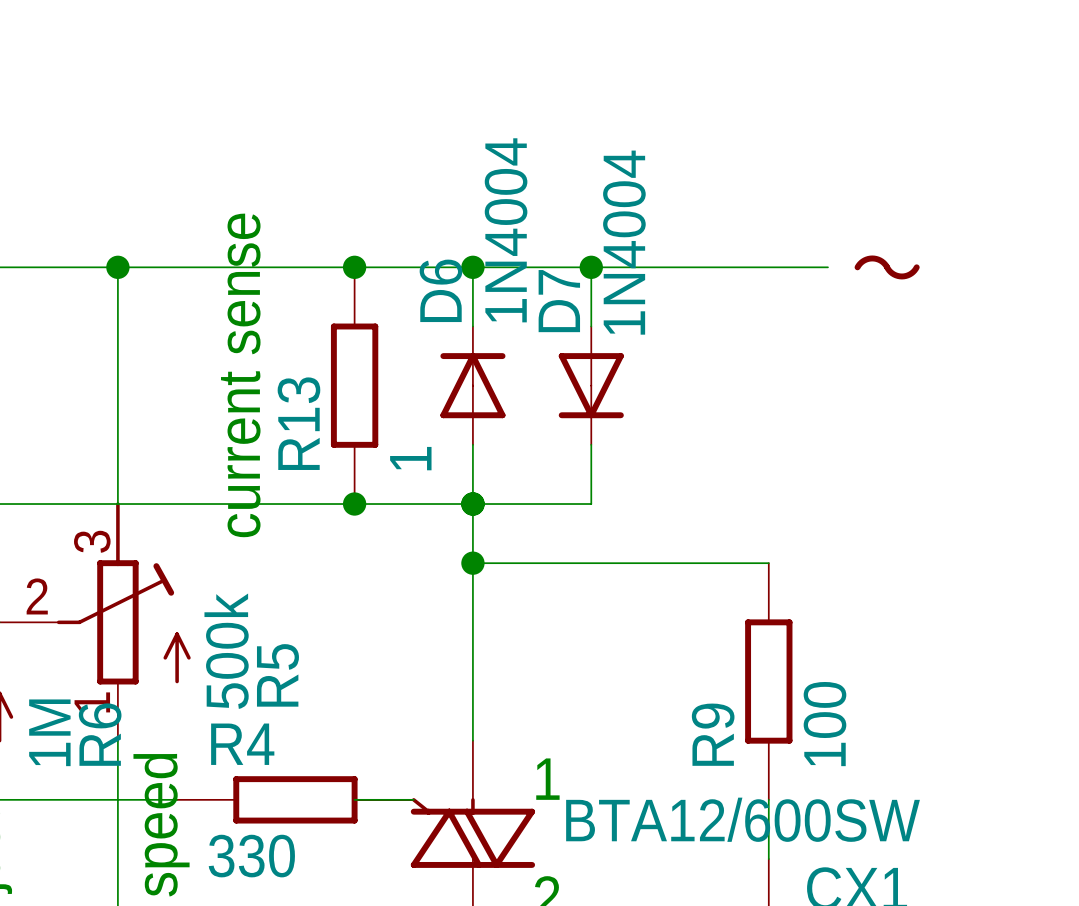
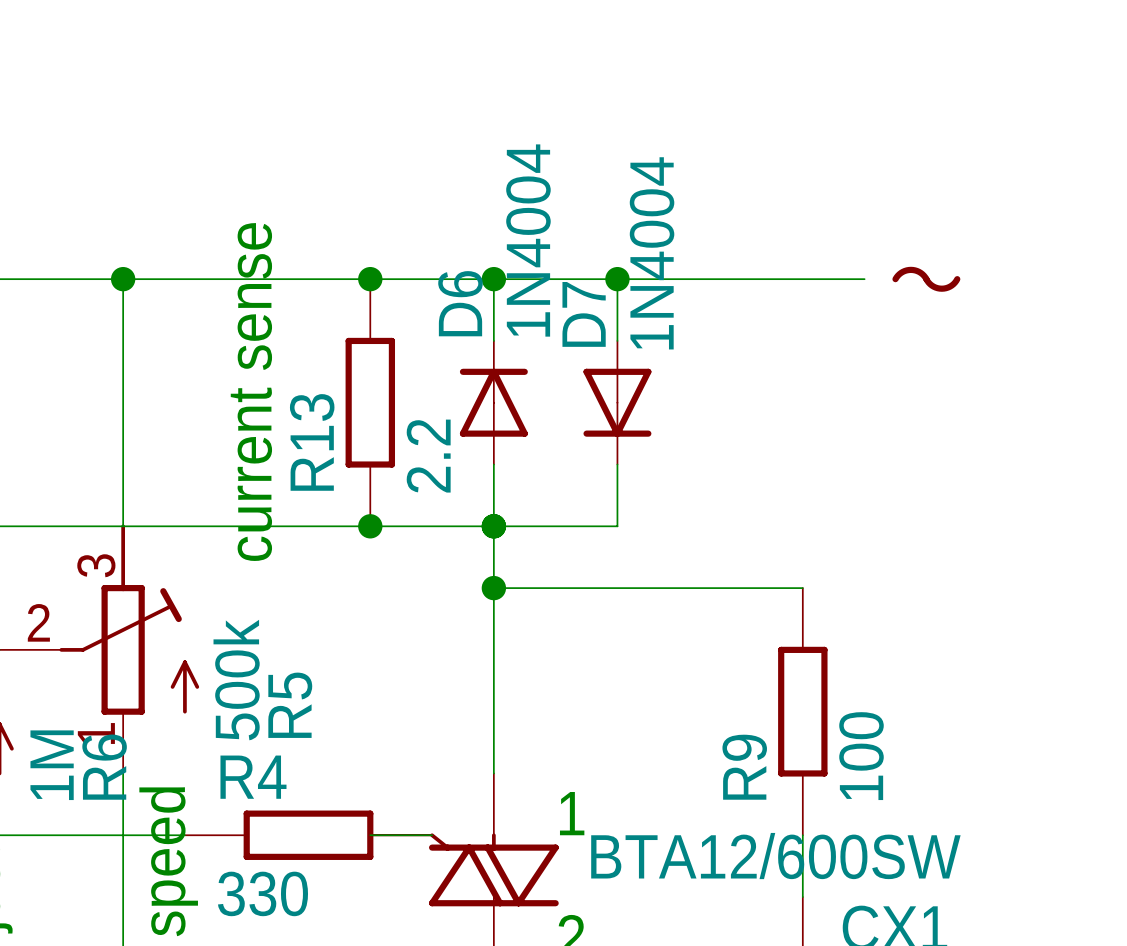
R13 value: 1 (410, 458) -> 2.2 (428, 456)

